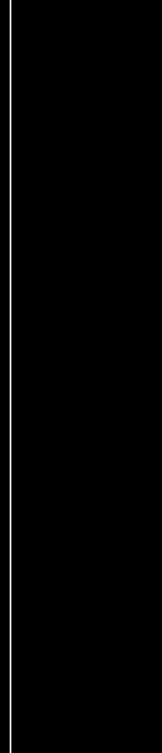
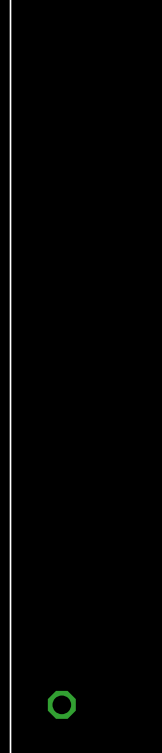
part: none -> (61, 704)

